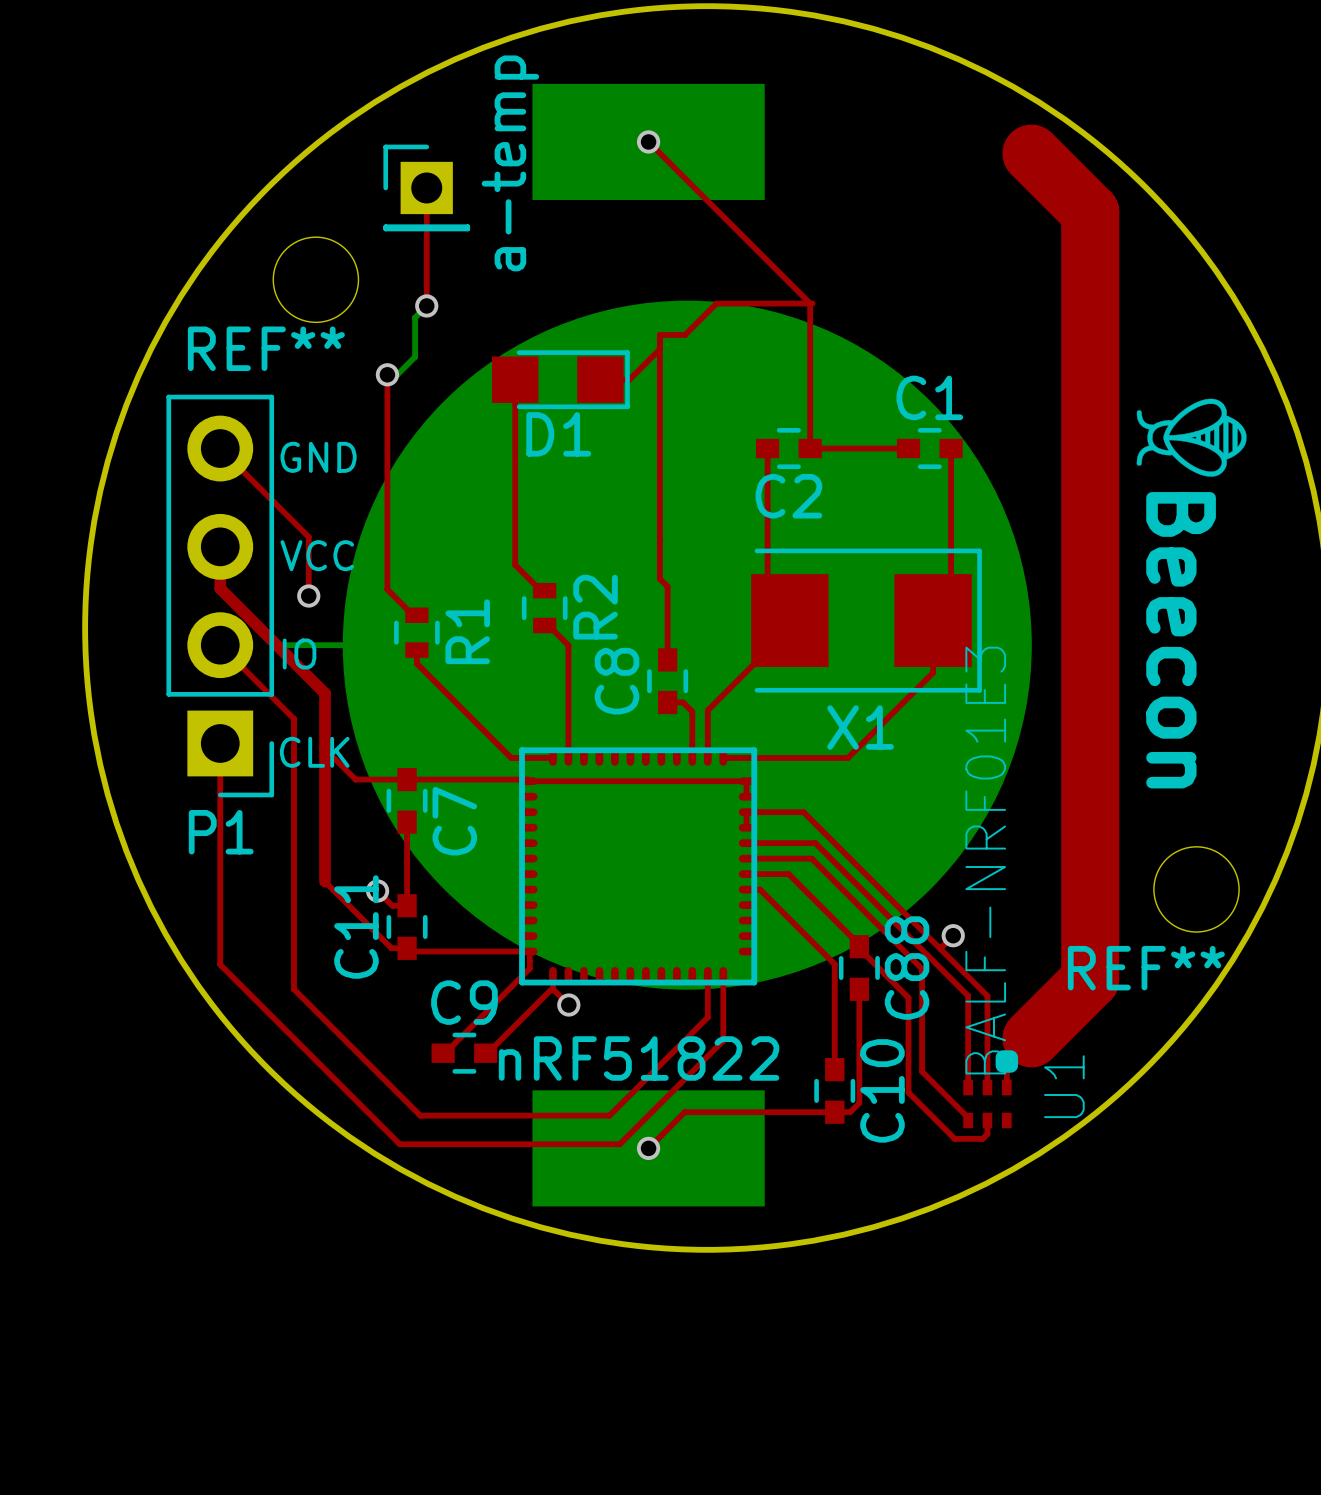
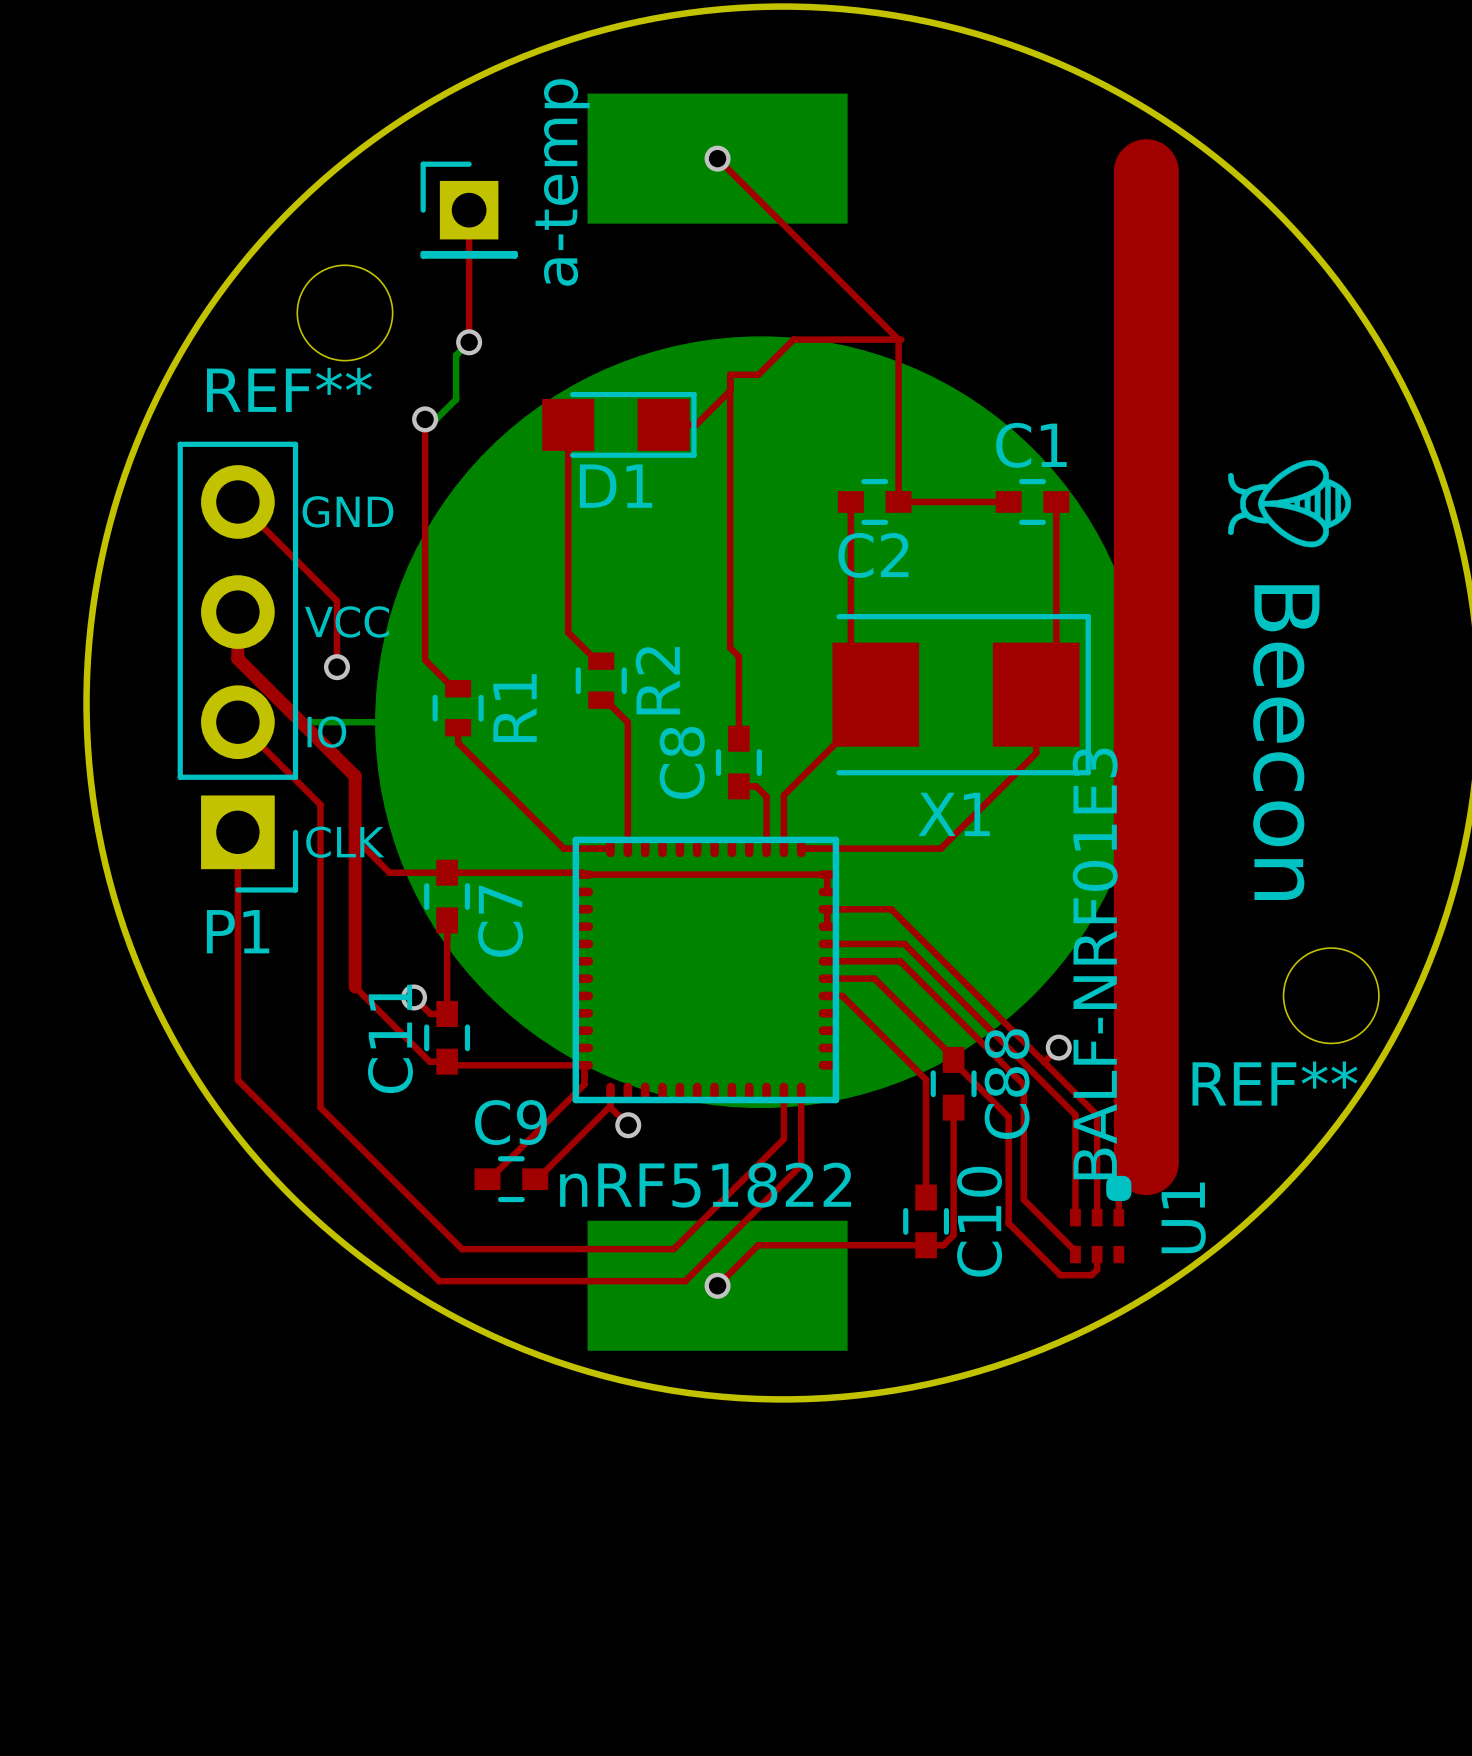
top track: (1031, 153) (1090, 212) (1090, 979) (1031, 1038) -> (1146, 171) (1146, 1162)
drawing position: (1191, 437) -> (1289, 503)
text position: Beecon (1181, 640) -> Beecon (1286, 742)

